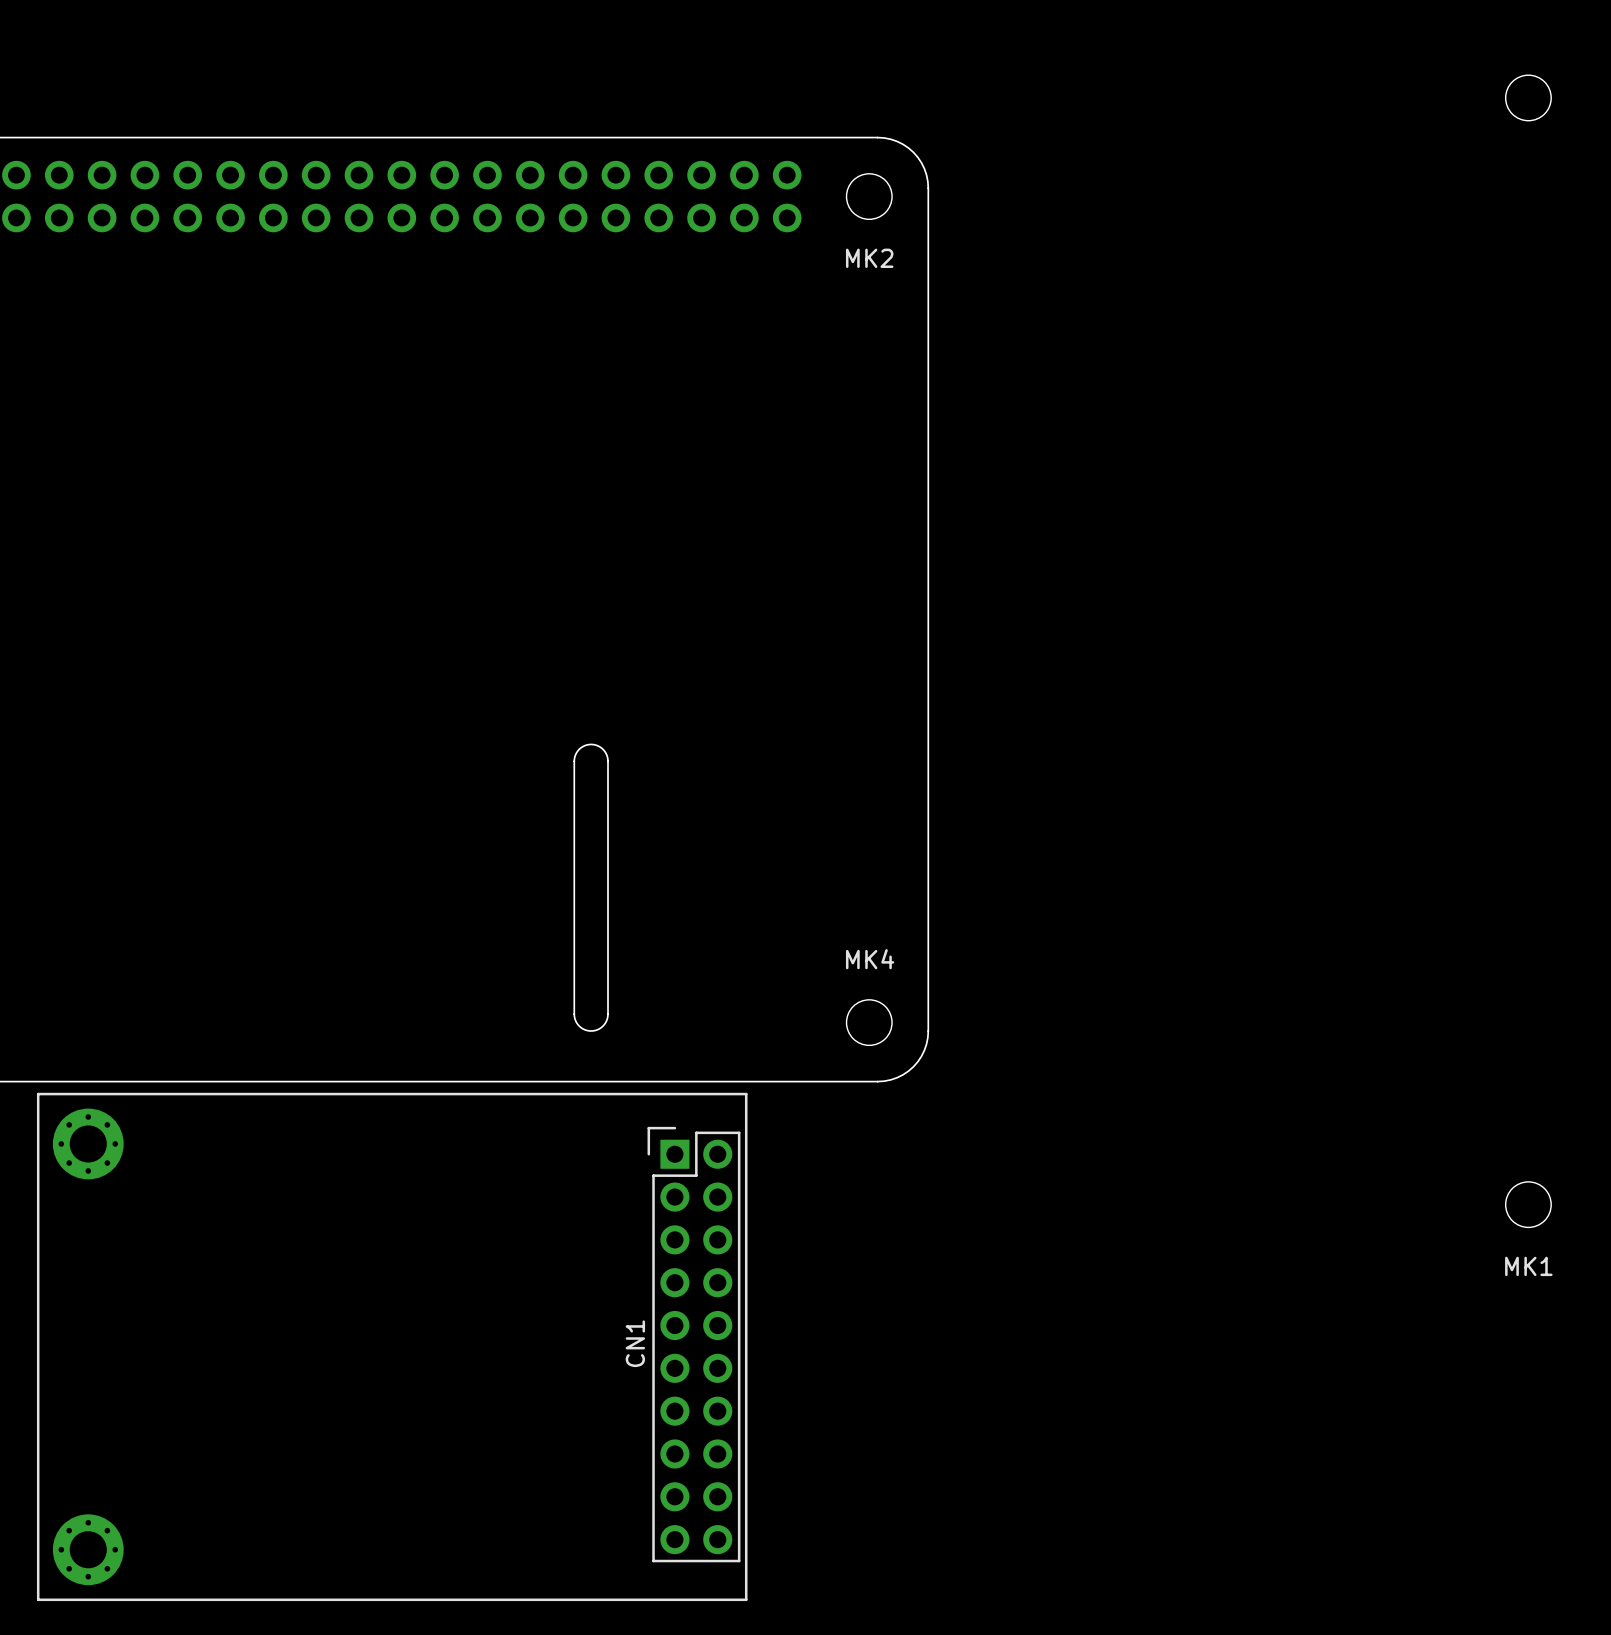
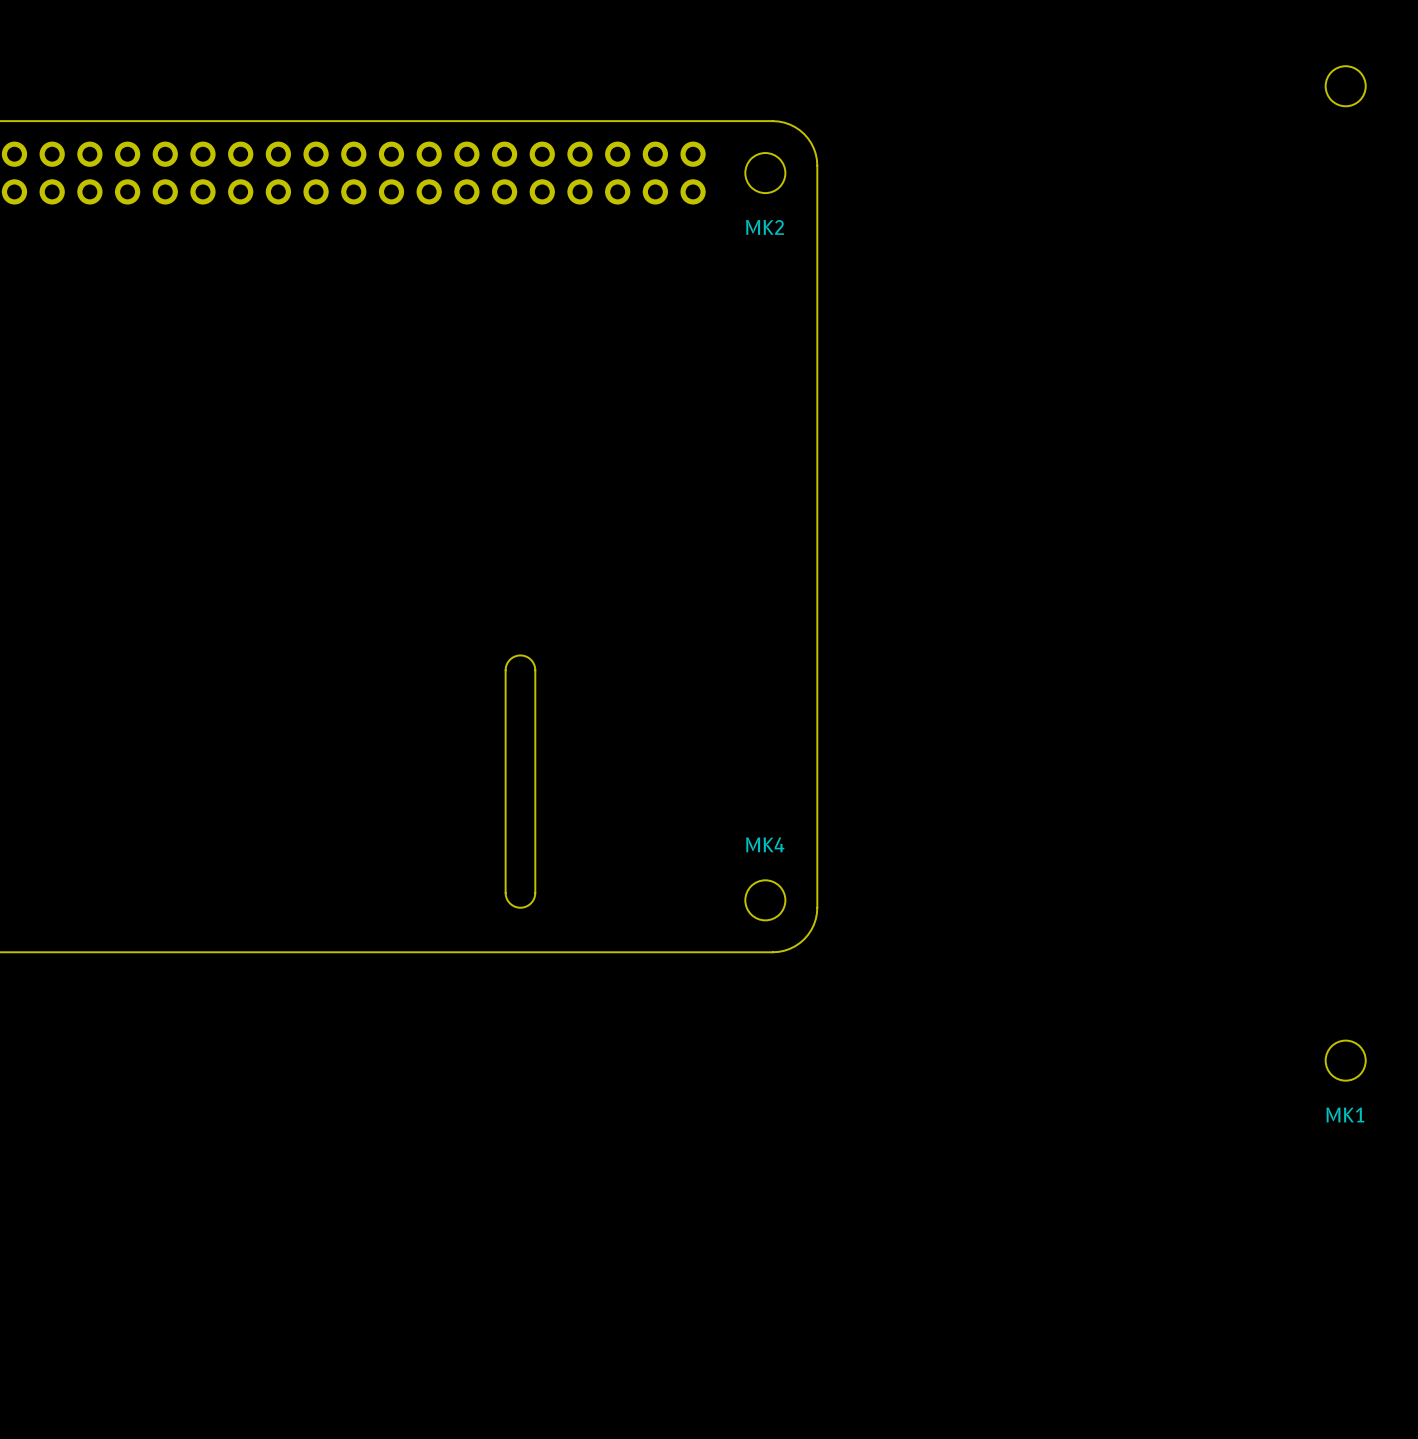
CN1: (392, 1346) -> none

